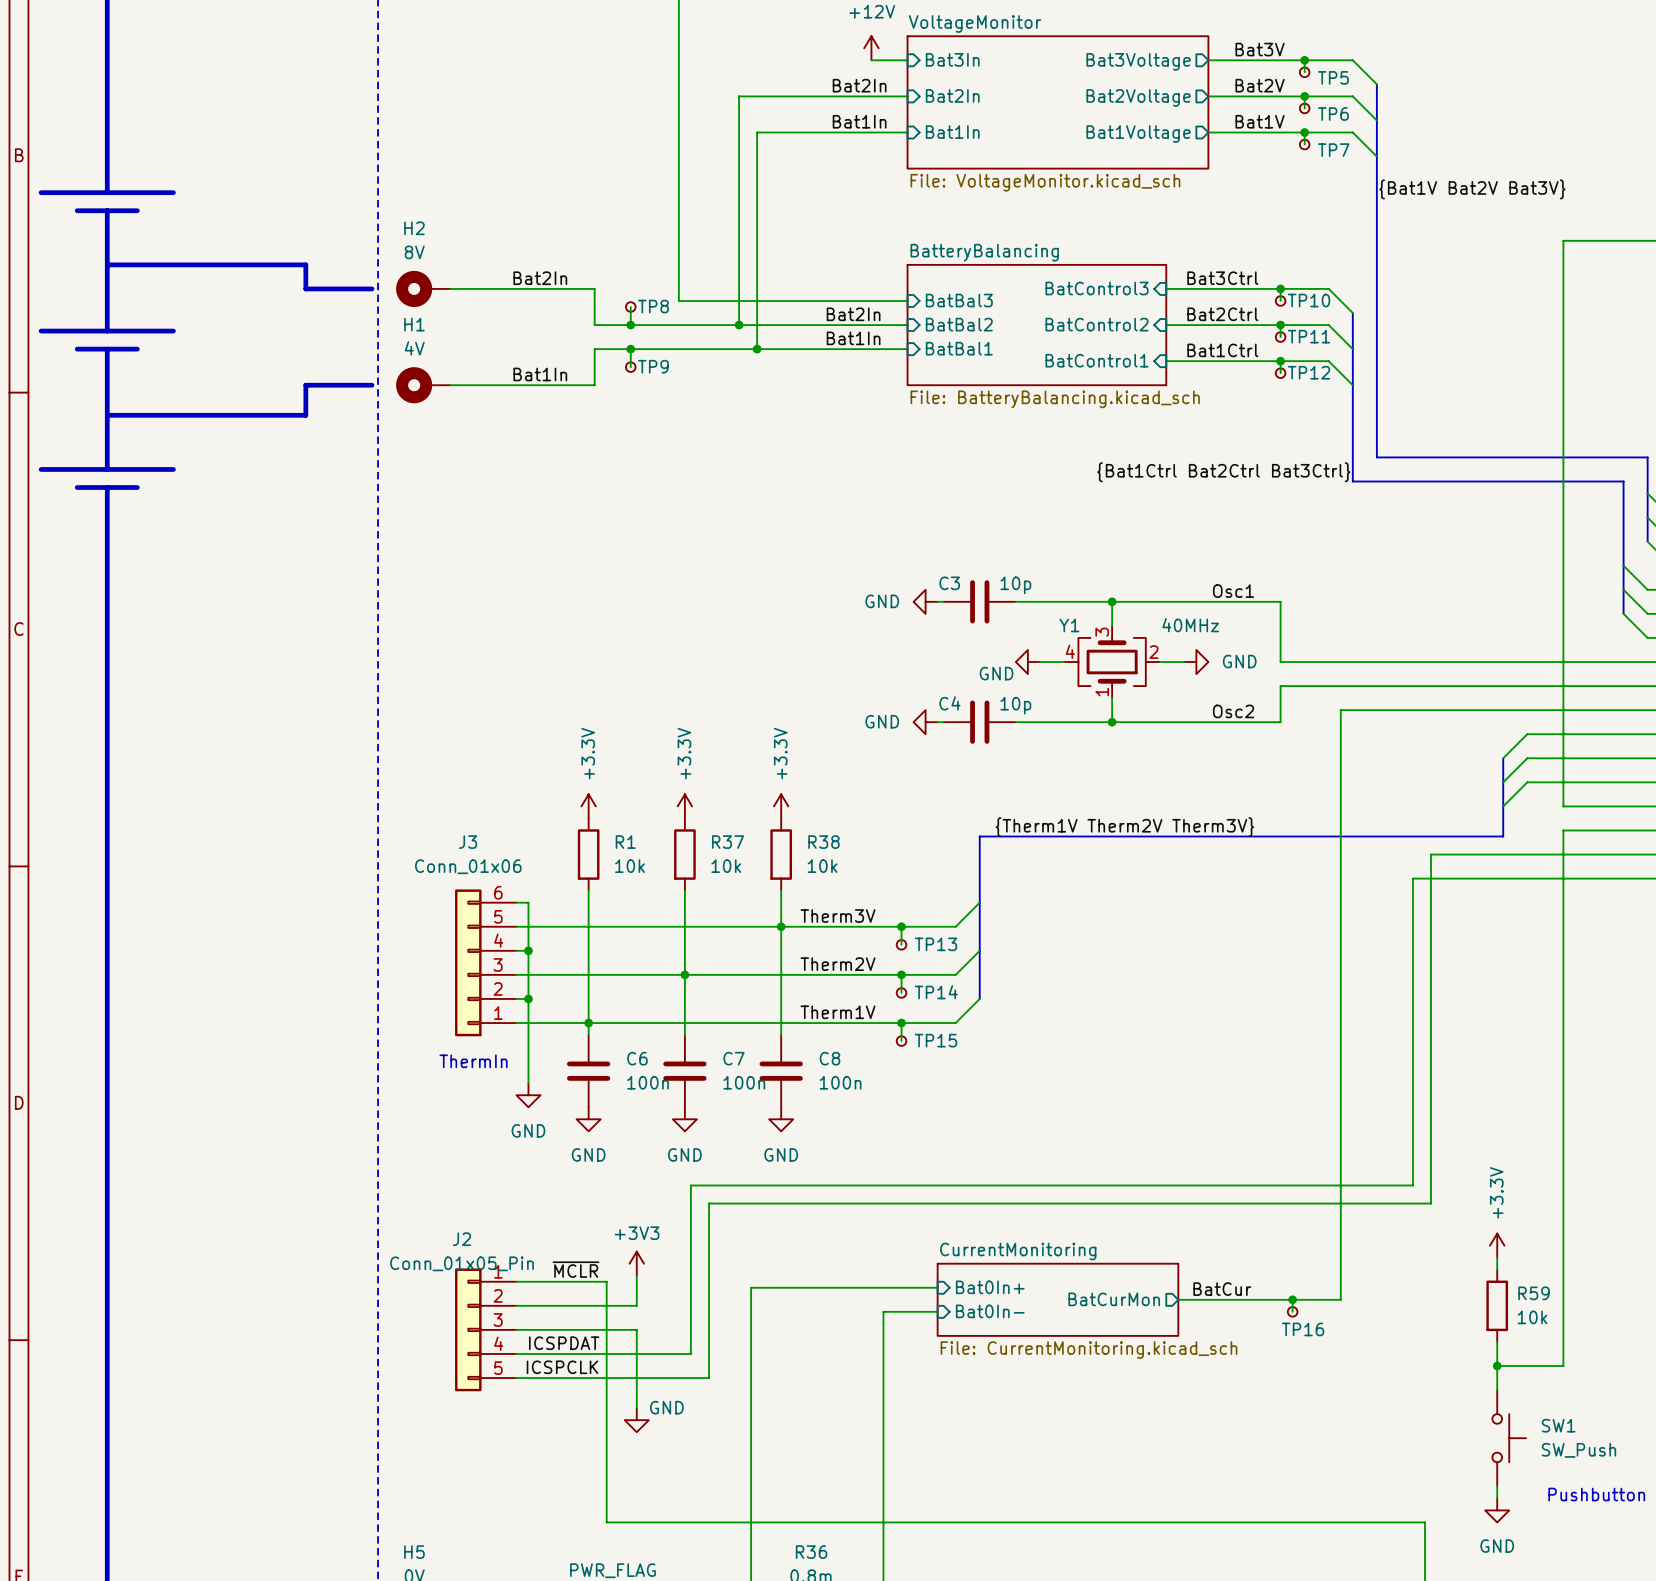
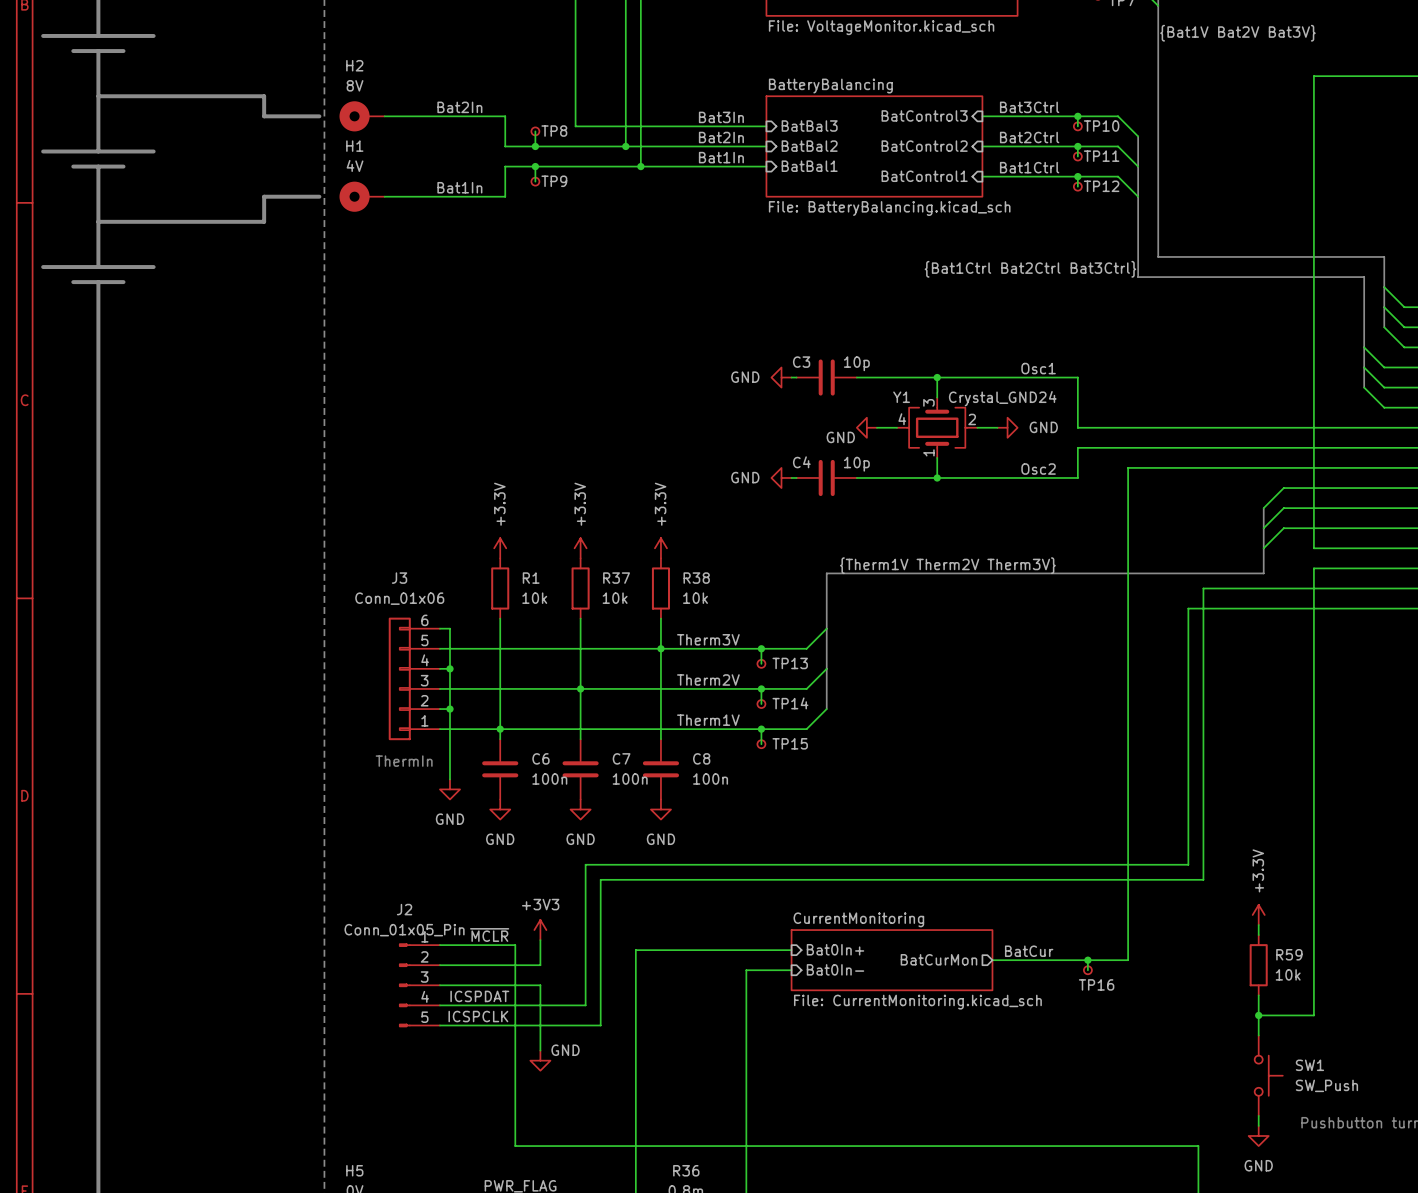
label: none -> Bat3In (721, 117)
Y1 value: 40MHz (1190, 625) -> Crystal_GND24 (1002, 398)
J2 symbol: [455, 1268, 517, 1392] -> [399, 943, 440, 1028]

